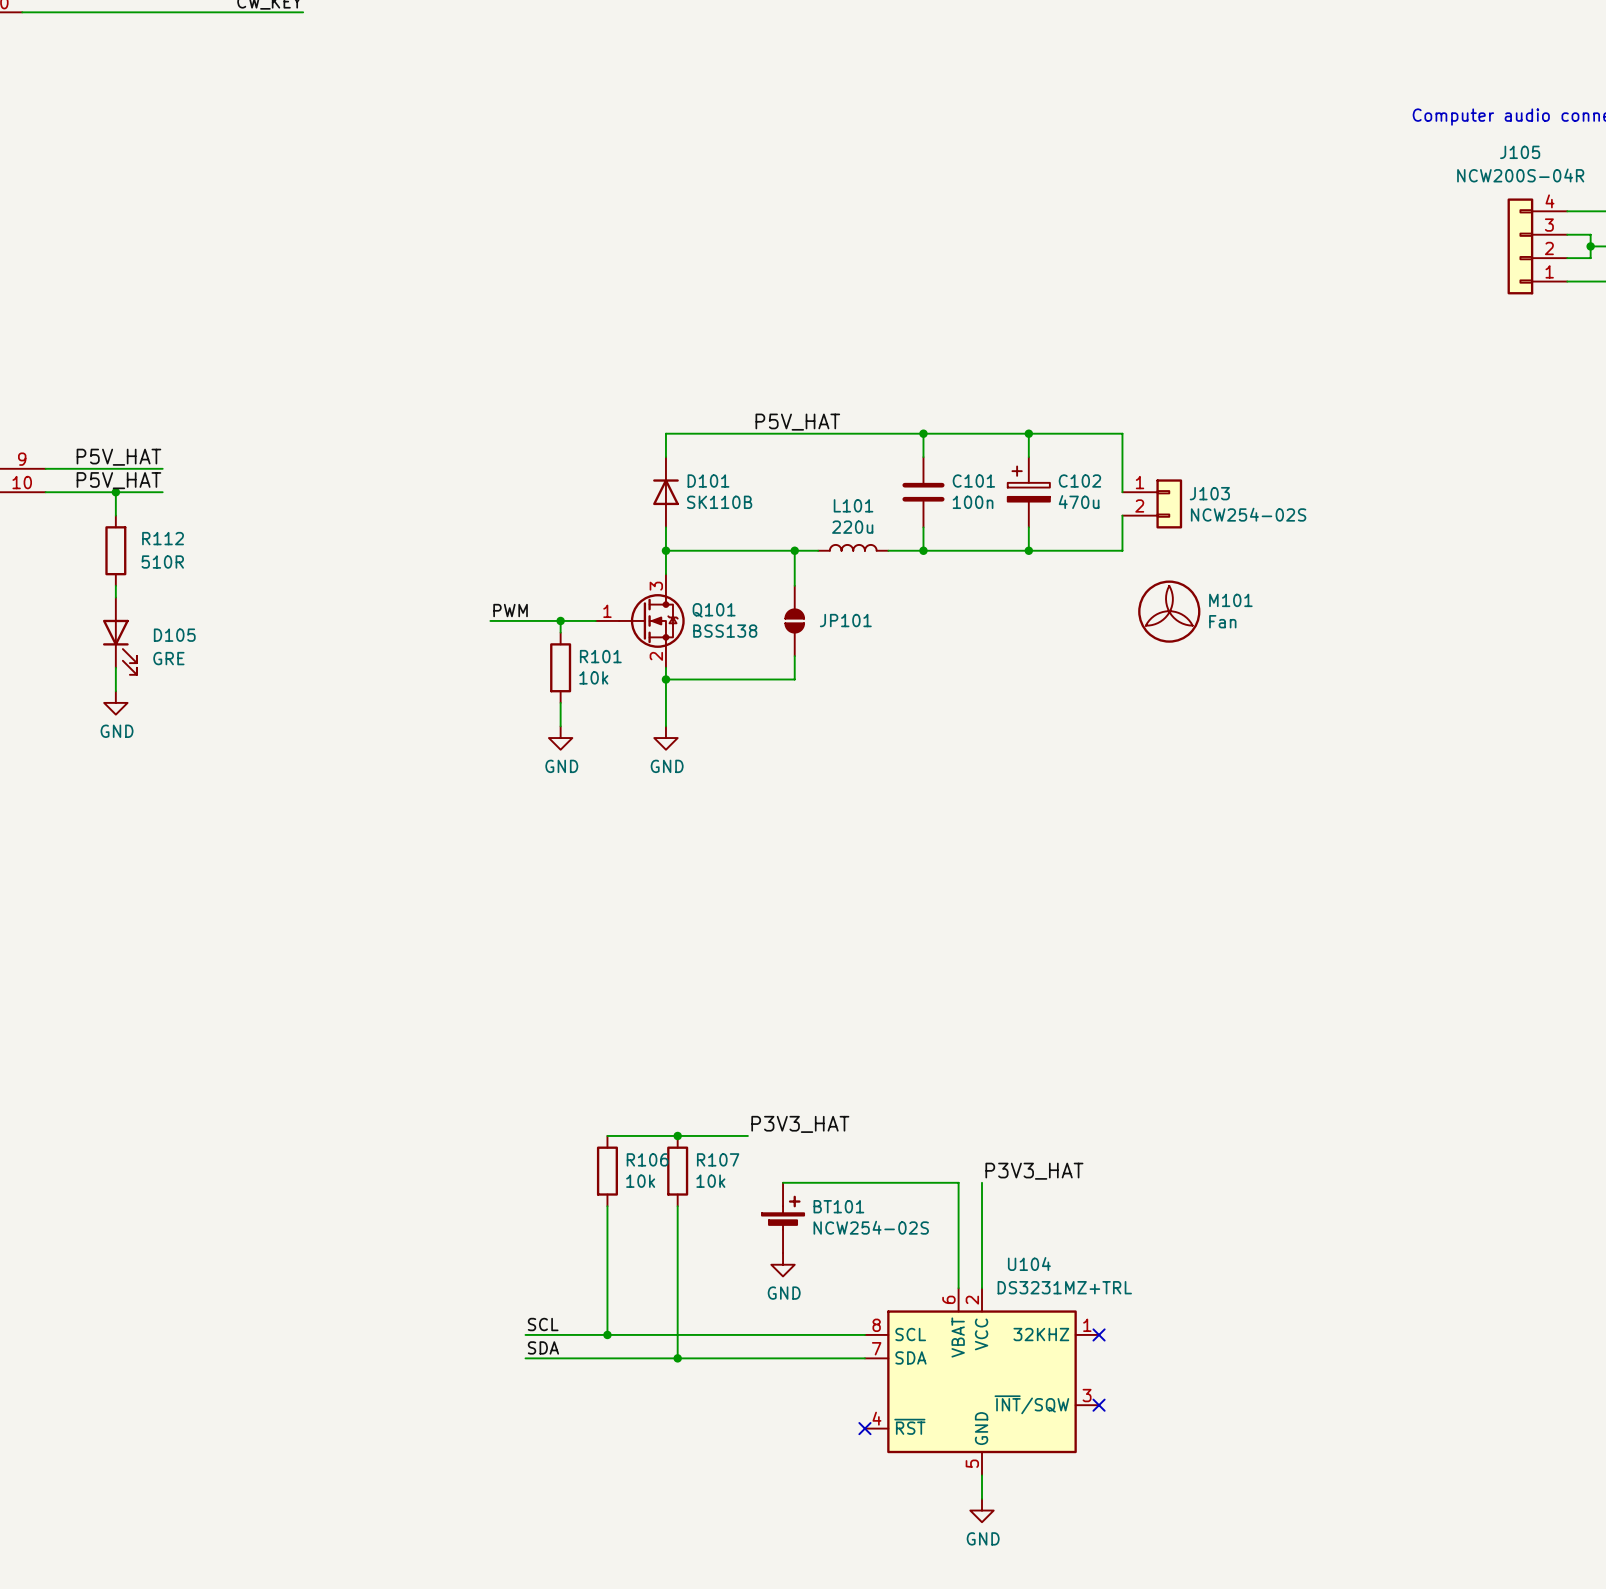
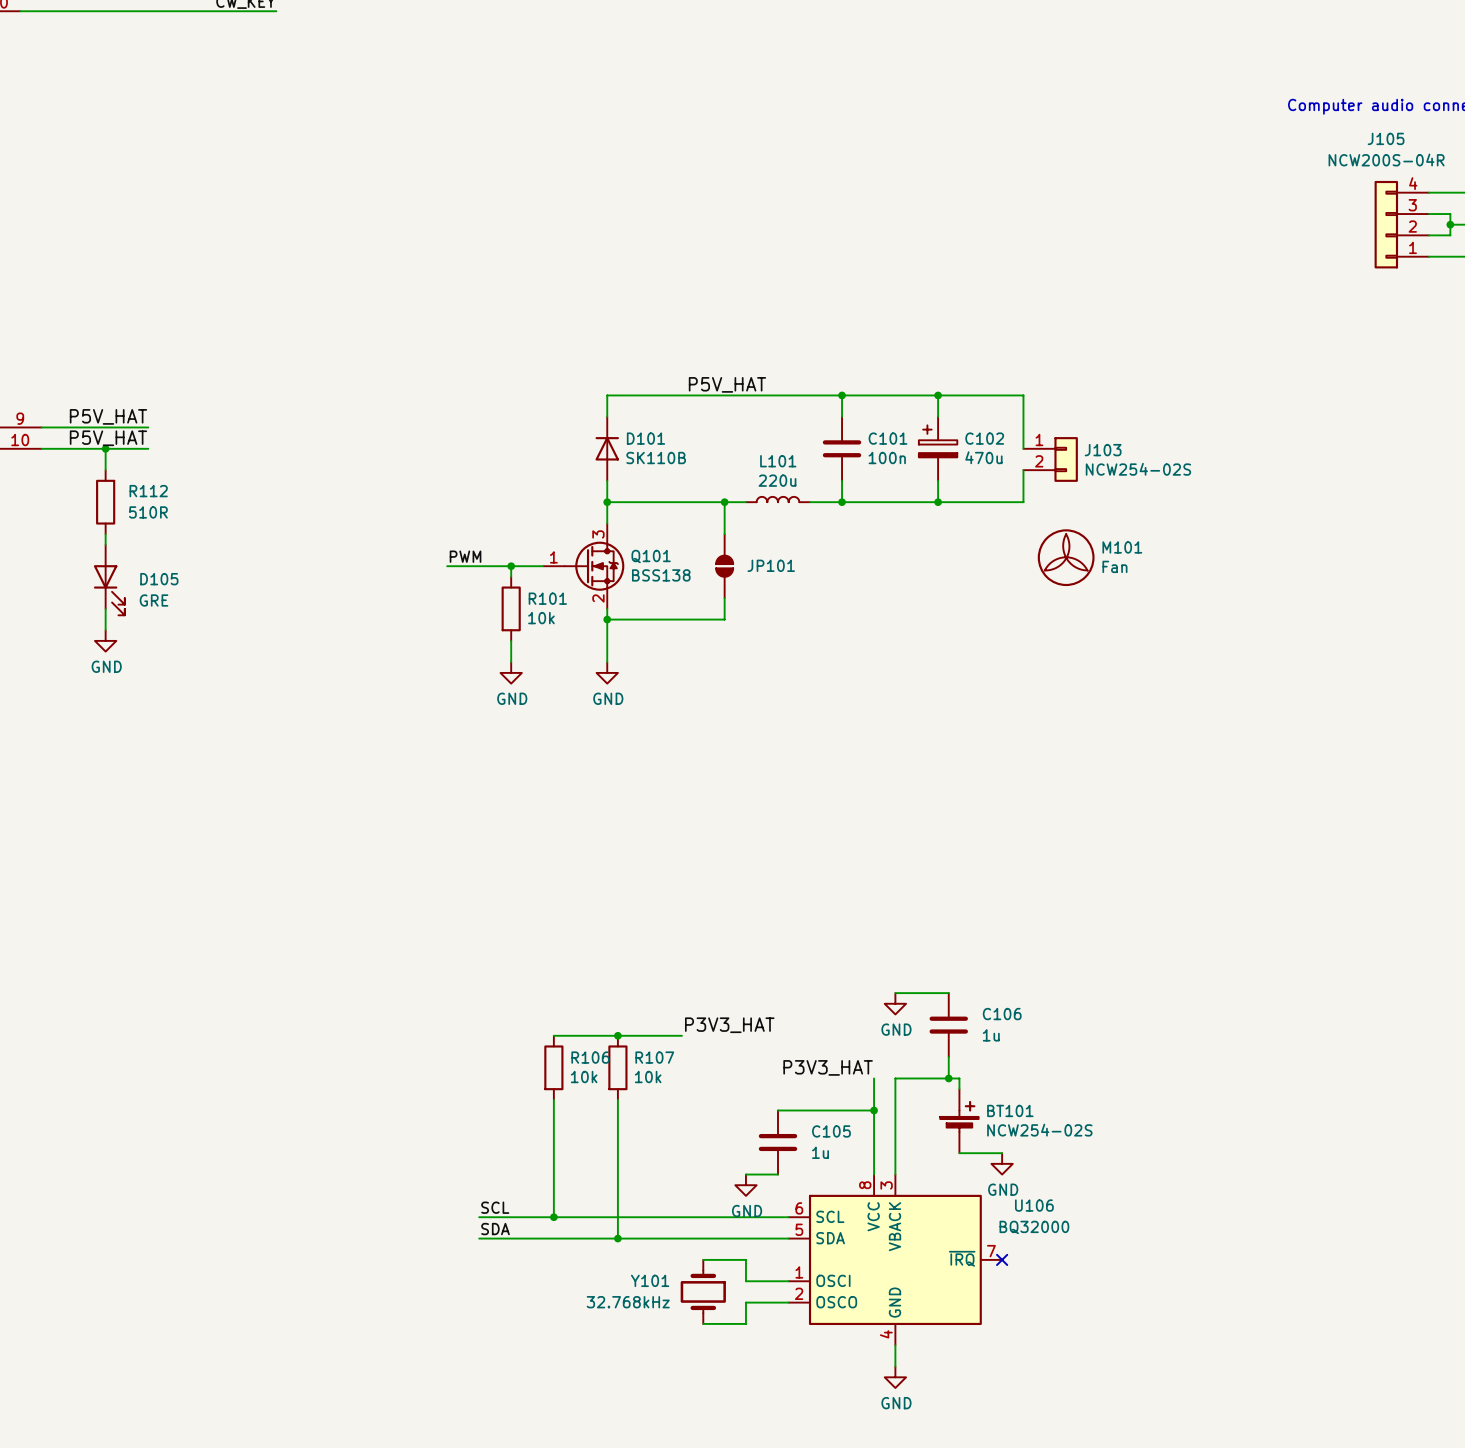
wire: none -> (895, 993) (948, 993)
power symbol: none -> GND (895, 1003)
C106: none -> 1u (948, 1025)
wire: none -> (948, 1057) (948, 1078)
label position: P3V3_HAT (1034, 1171) -> P3V3_HAT (828, 1067)
wire: (783, 1182) (958, 1182) -> none
wire: none -> (895, 1078) (959, 1078) (959, 1089)
junction: none -> (948, 1078)
BT101 position: (783, 1217) -> (959, 1121)
wire: none -> (778, 1110) (874, 1110)
junction: none -> (874, 1110)
C105: none -> 1u (778, 1142)
power symbol position: GND (783, 1264) -> GND (745, 1185)
wire: none -> (959, 1153) (1002, 1153)
power symbol: none -> GND (1002, 1163)
wire: none -> (745, 1174) (778, 1174)
no-connect mark: (1099, 1334) -> none
wire: none -> (703, 1259) (745, 1259) (745, 1281) (788, 1281)
U104: DS3231MZ+TRL (982, 1381) -> none
U106: none -> BQ32000 (895, 1259)
no-connect mark: none -> (1002, 1259)
no-connect mark: (1099, 1405) -> none
Y101: none -> 32.768kHz (703, 1291)
wire: none -> (788, 1302) (745, 1302) (745, 1323) (703, 1323)
no-connect mark: (864, 1428) -> none

